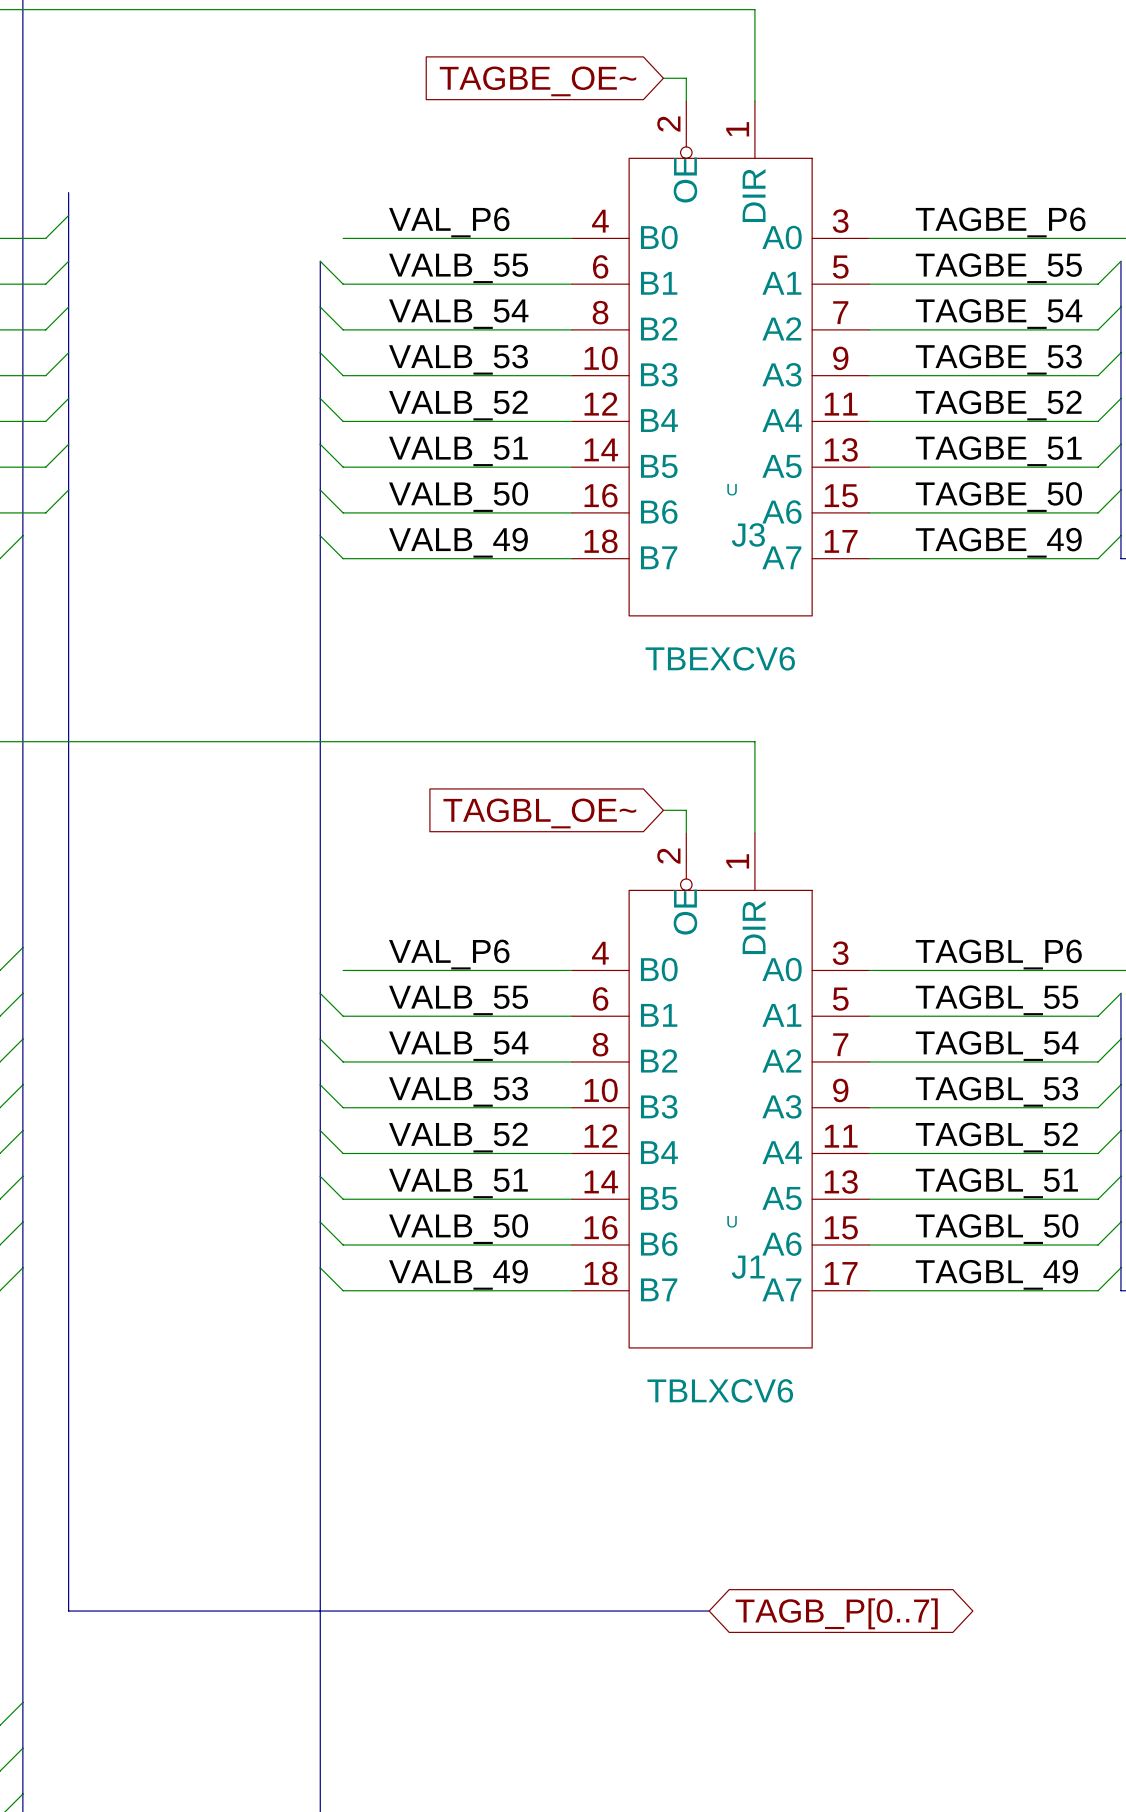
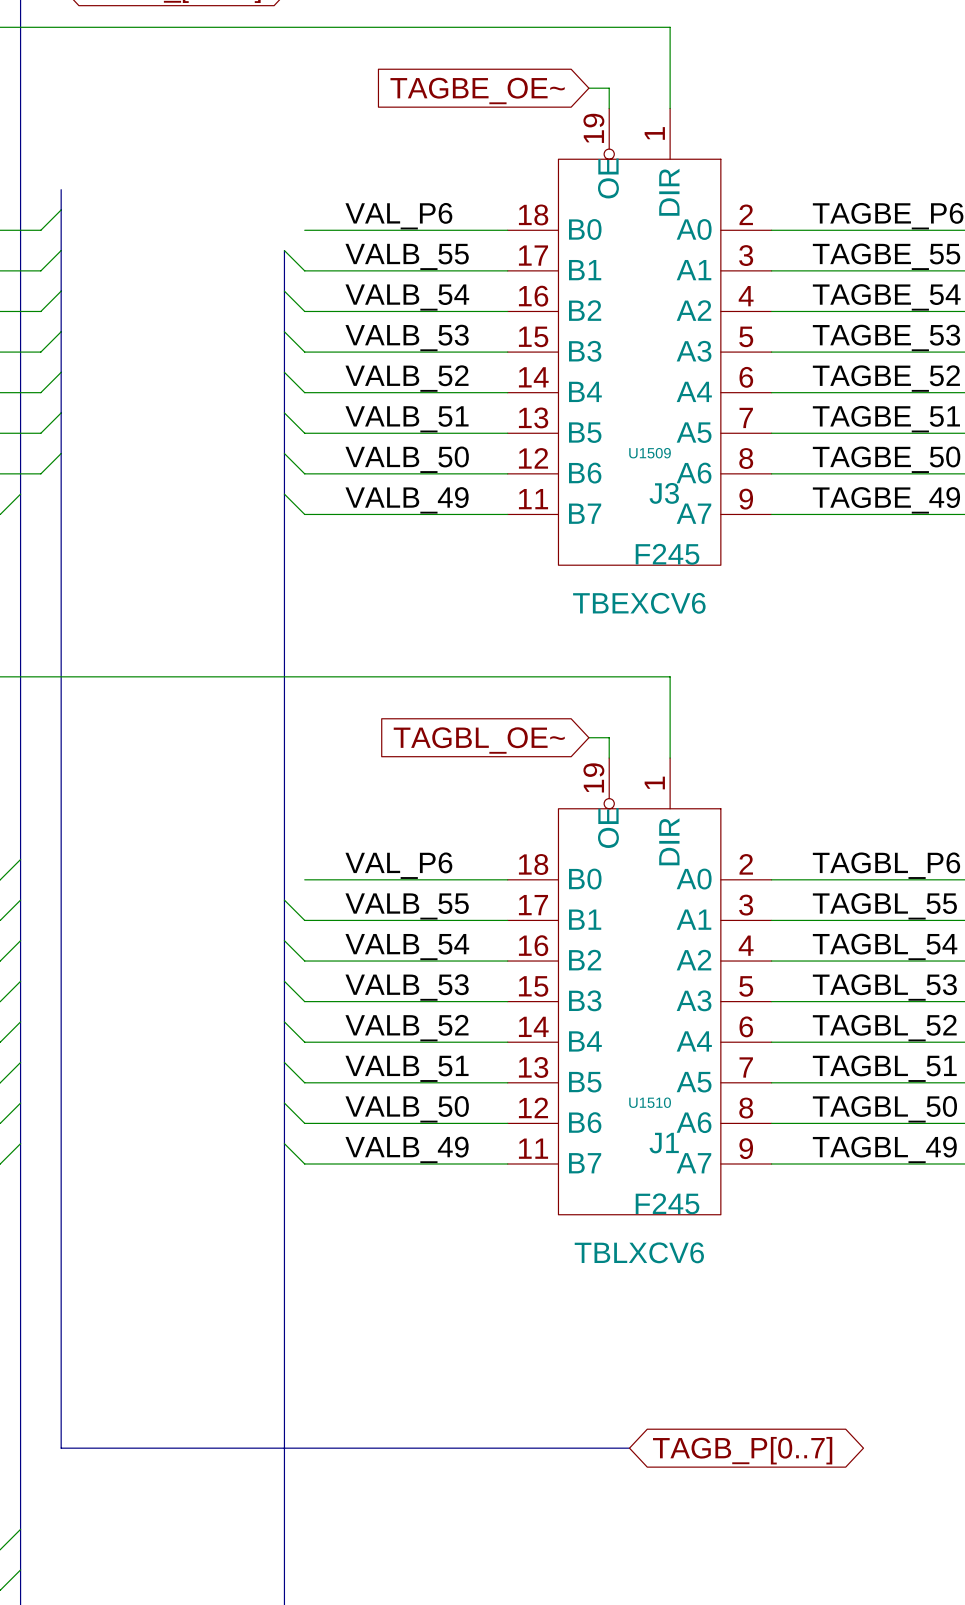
U symbol: [571, 101, 870, 616] -> [507, 108, 772, 566]
U name: U (732, 489) -> U1509 (650, 453)
U value: none -> F245 (667, 554)
U symbol: [571, 833, 870, 1348] -> [507, 758, 772, 1215]
U name: U (732, 1221) -> U1510 (650, 1102)
U value: none -> F245 (667, 1203)

